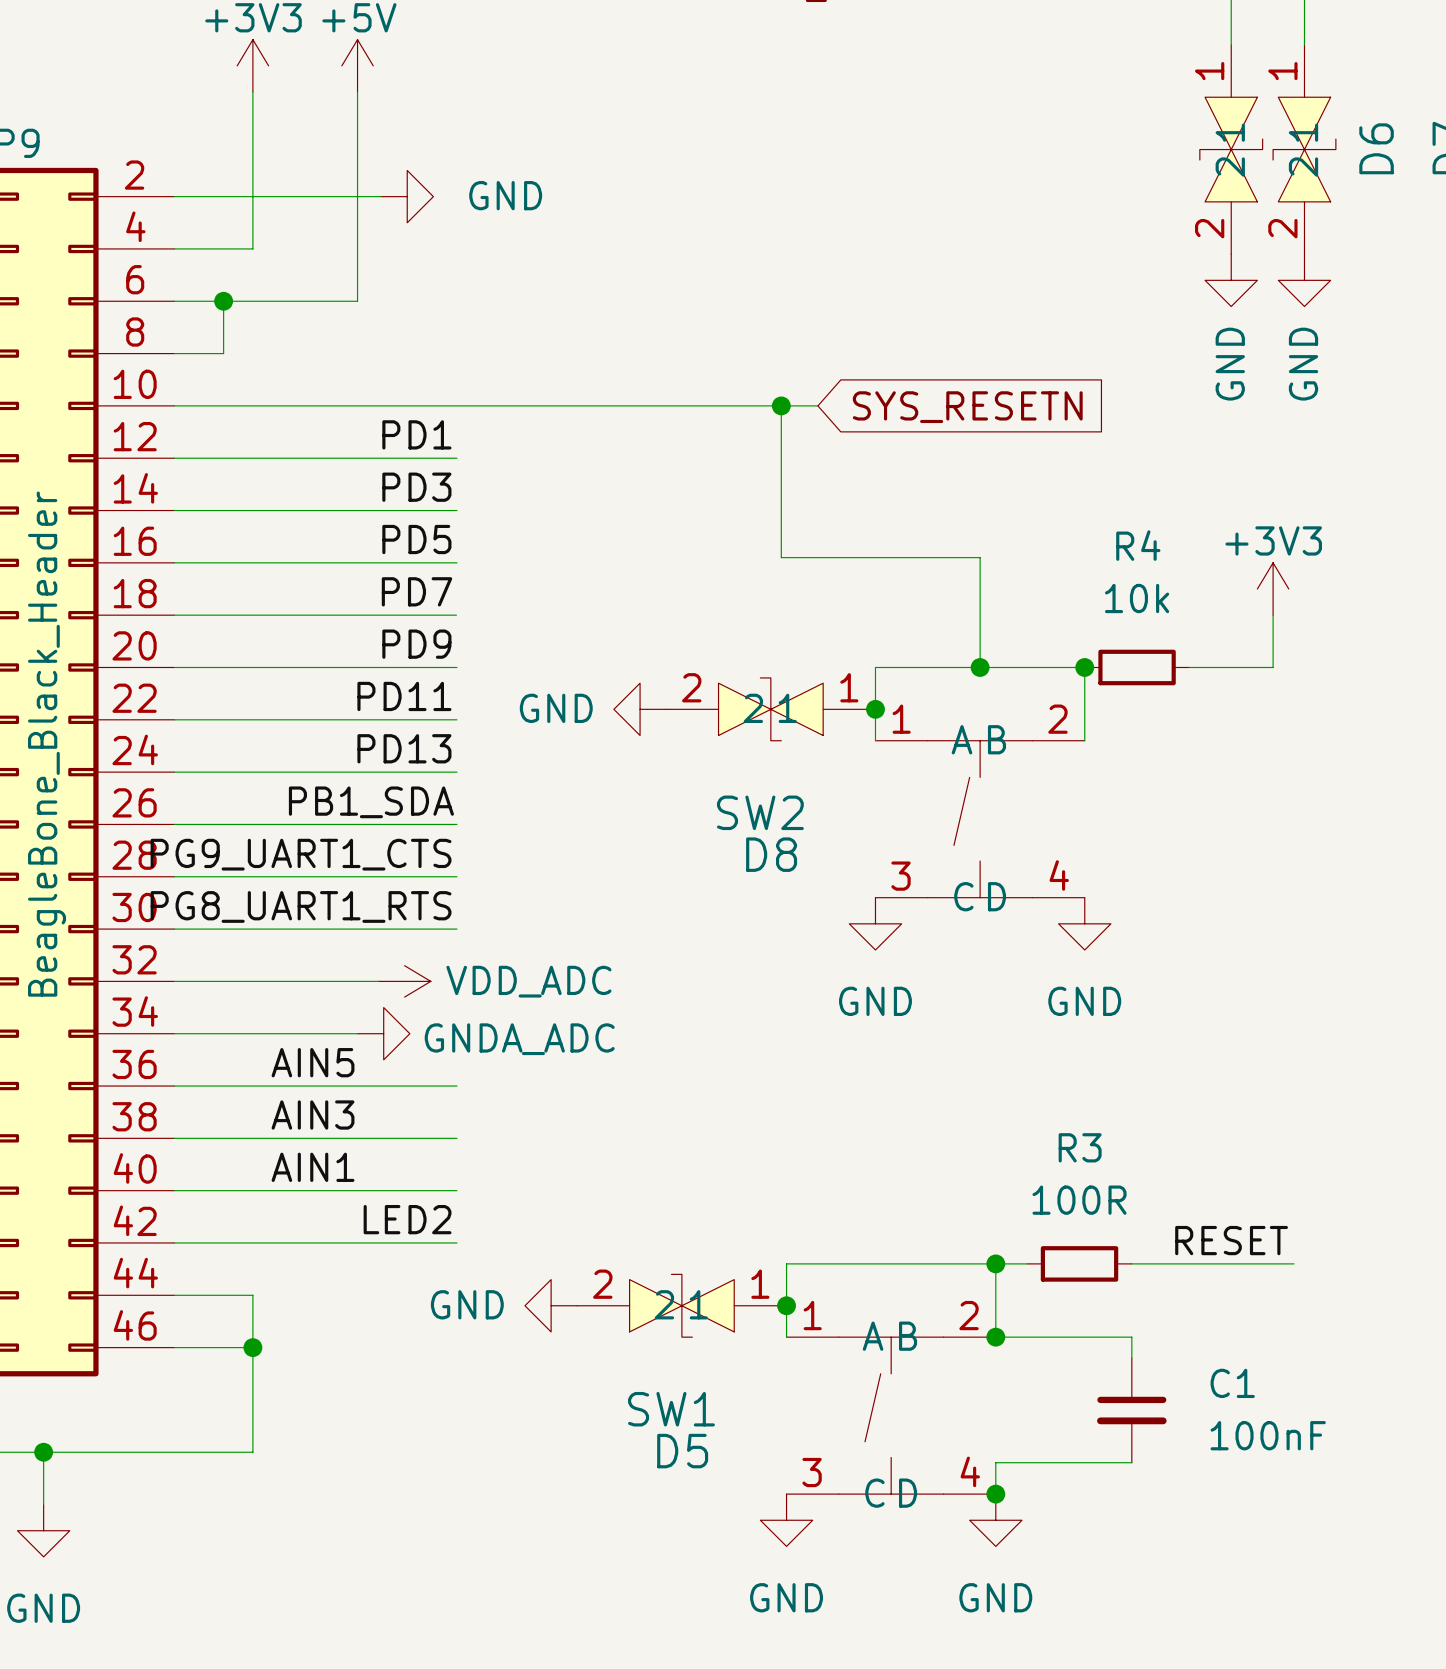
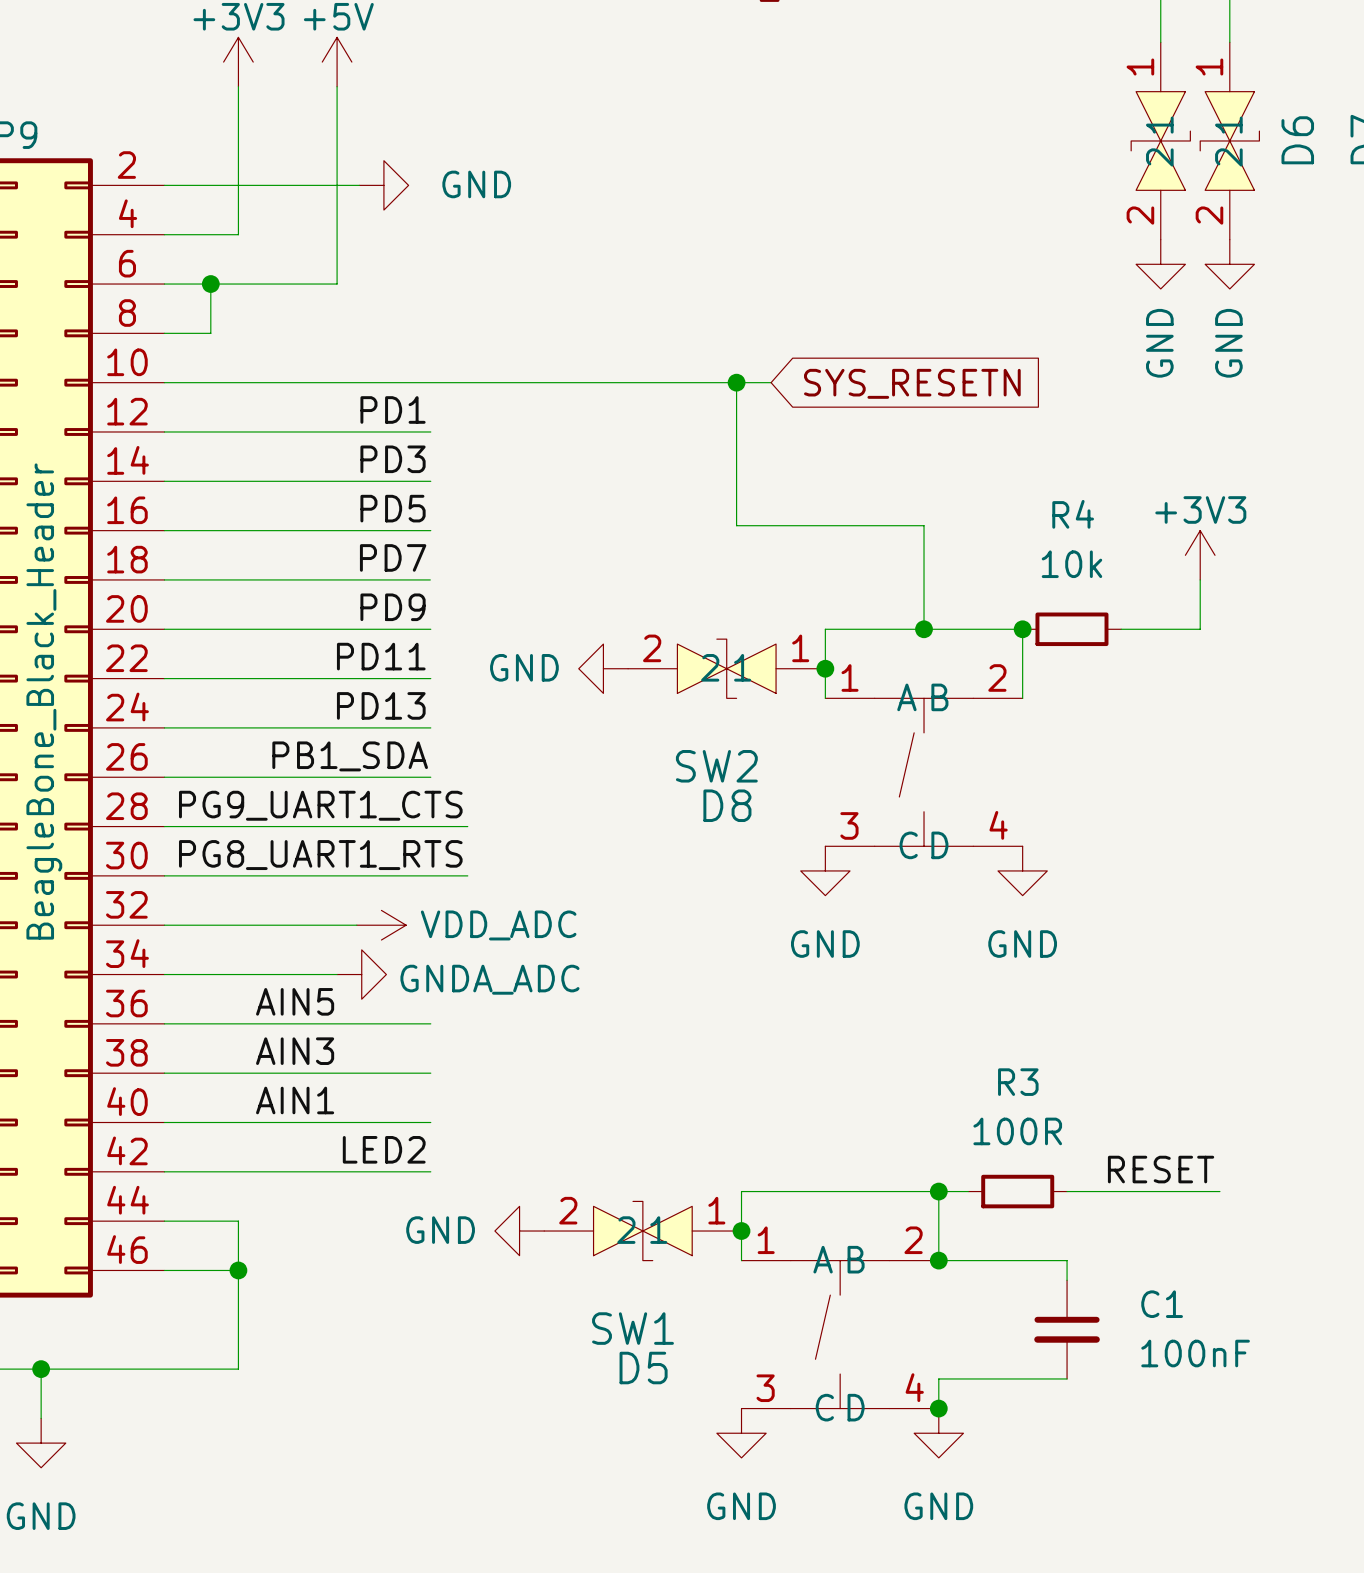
label position: PG9_UART1_CTS (301, 854) -> PG9_UART1_CTS (320, 805)
wire: none -> (430, 826) (467, 826)
label position: PG8_UART1_RTS (301, 906) -> PG8_UART1_RTS (320, 855)
wire: none -> (430, 875) (467, 875)

